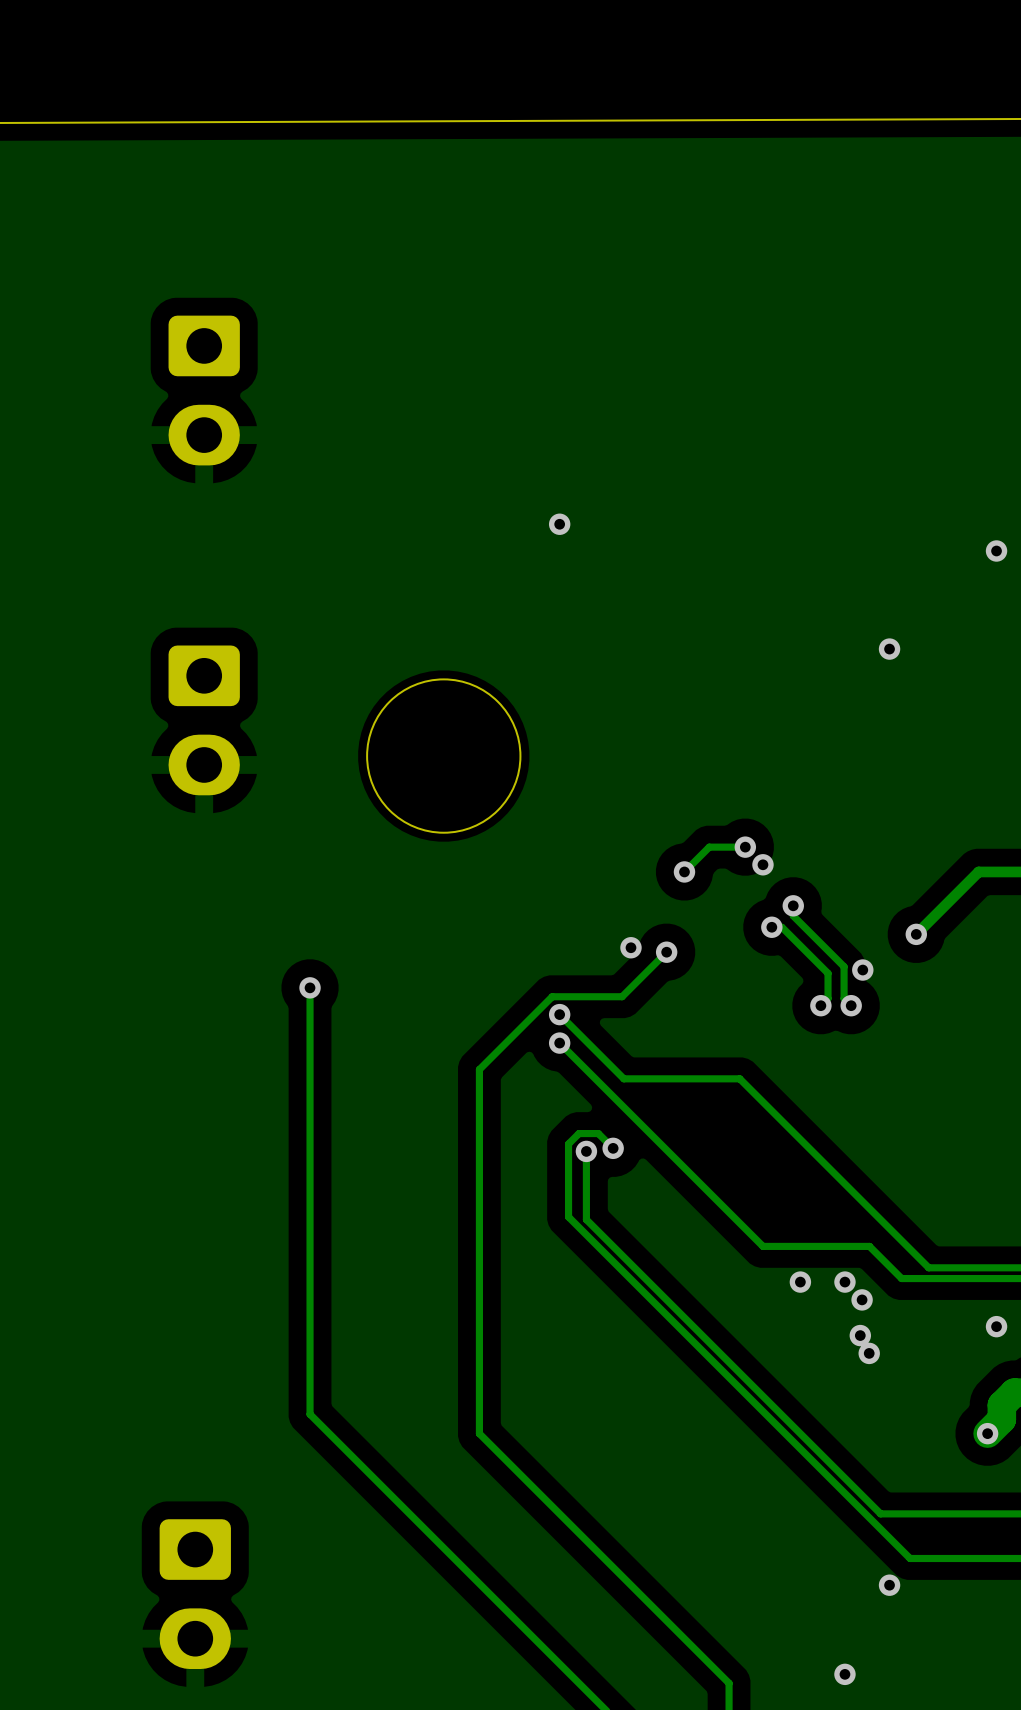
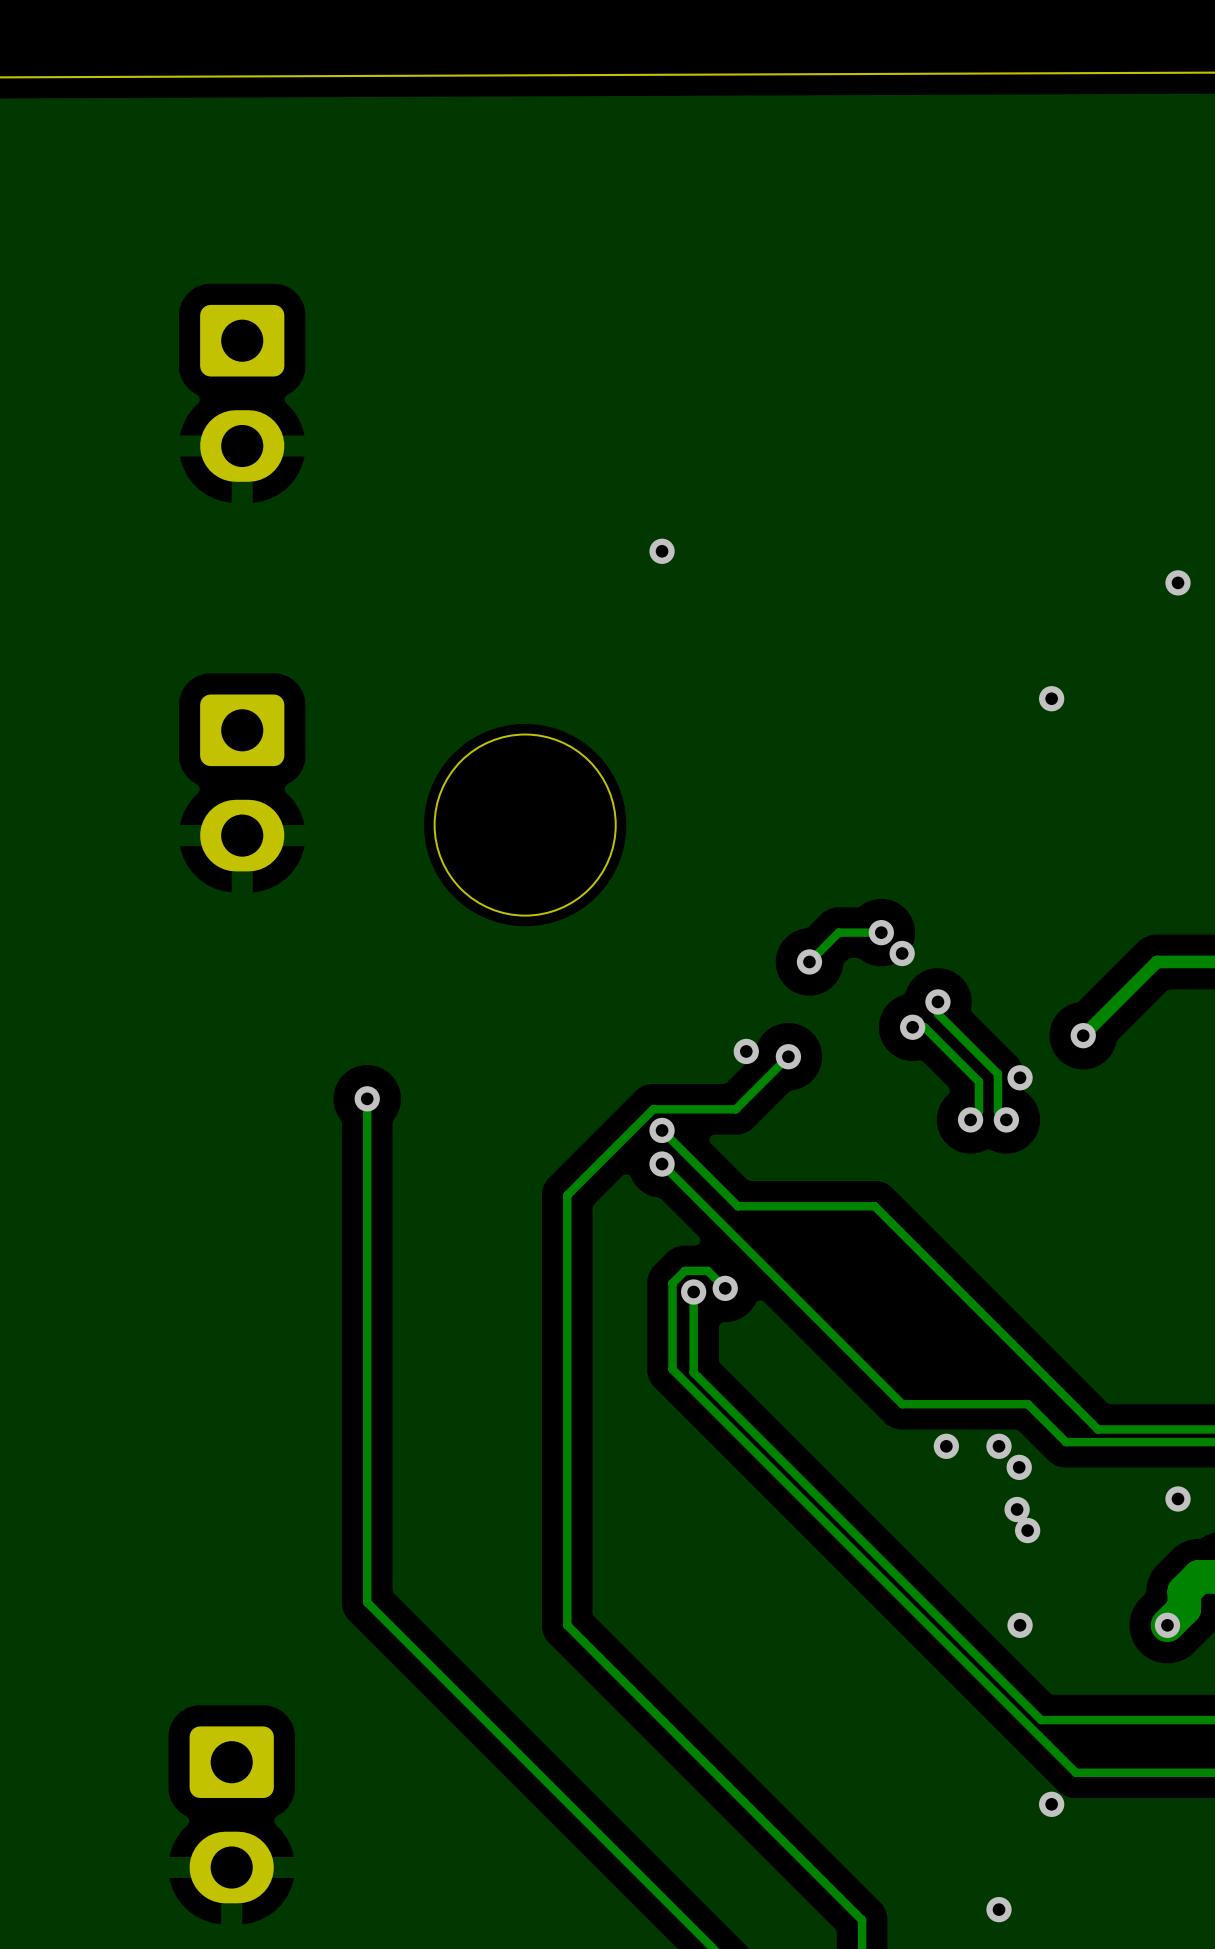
via: none -> (1020, 1625)

